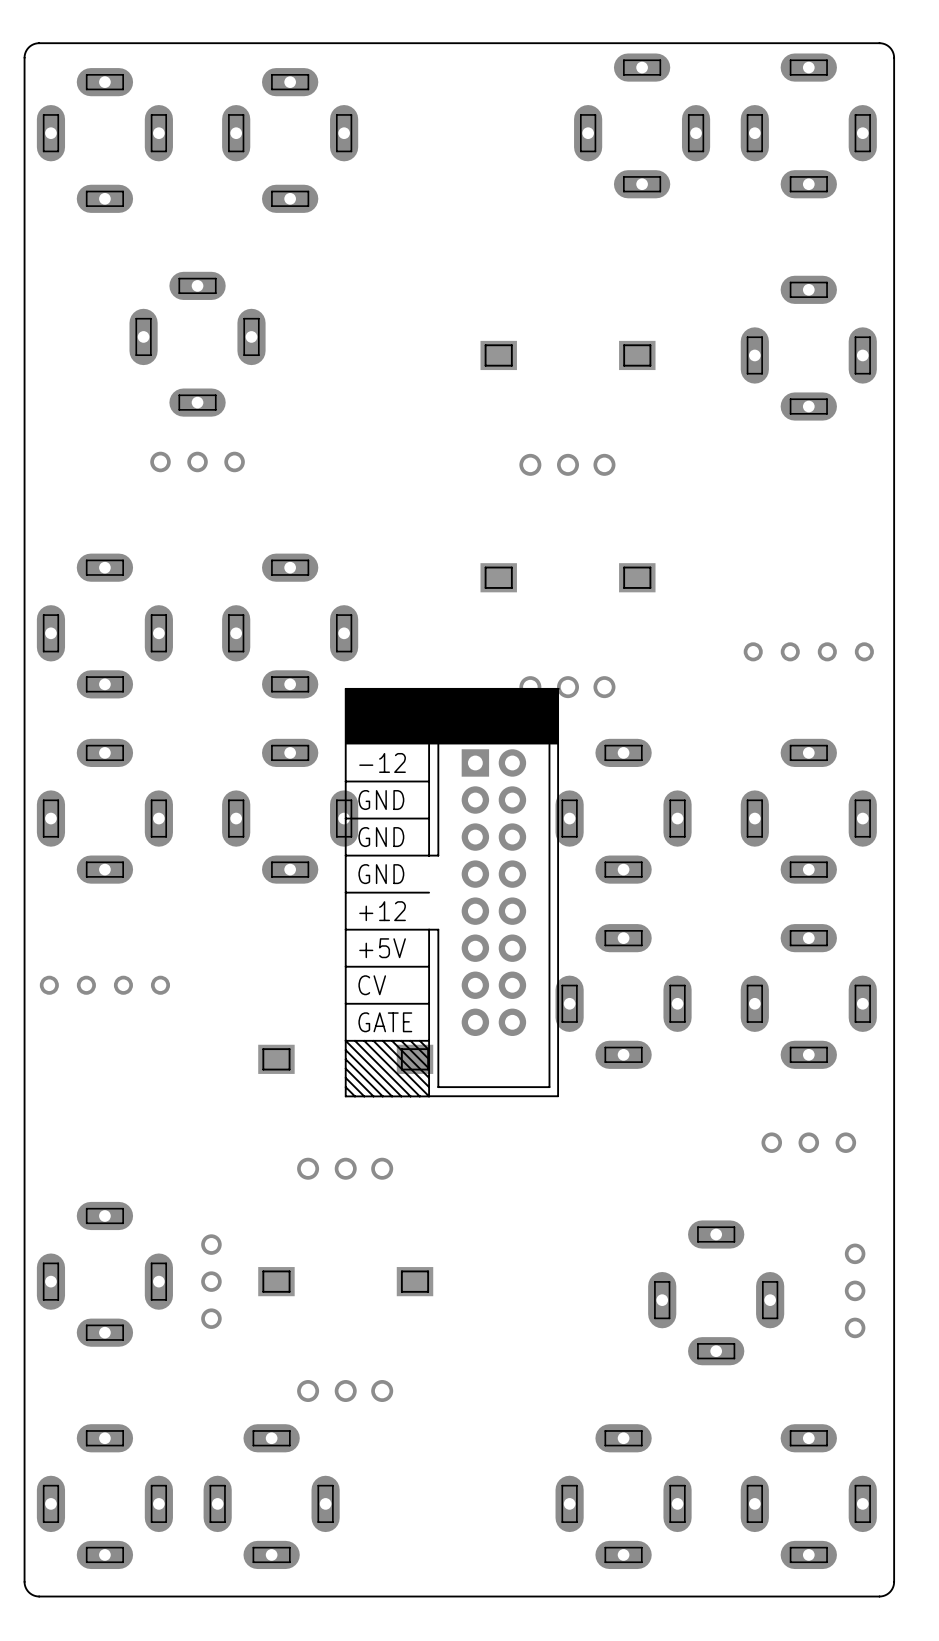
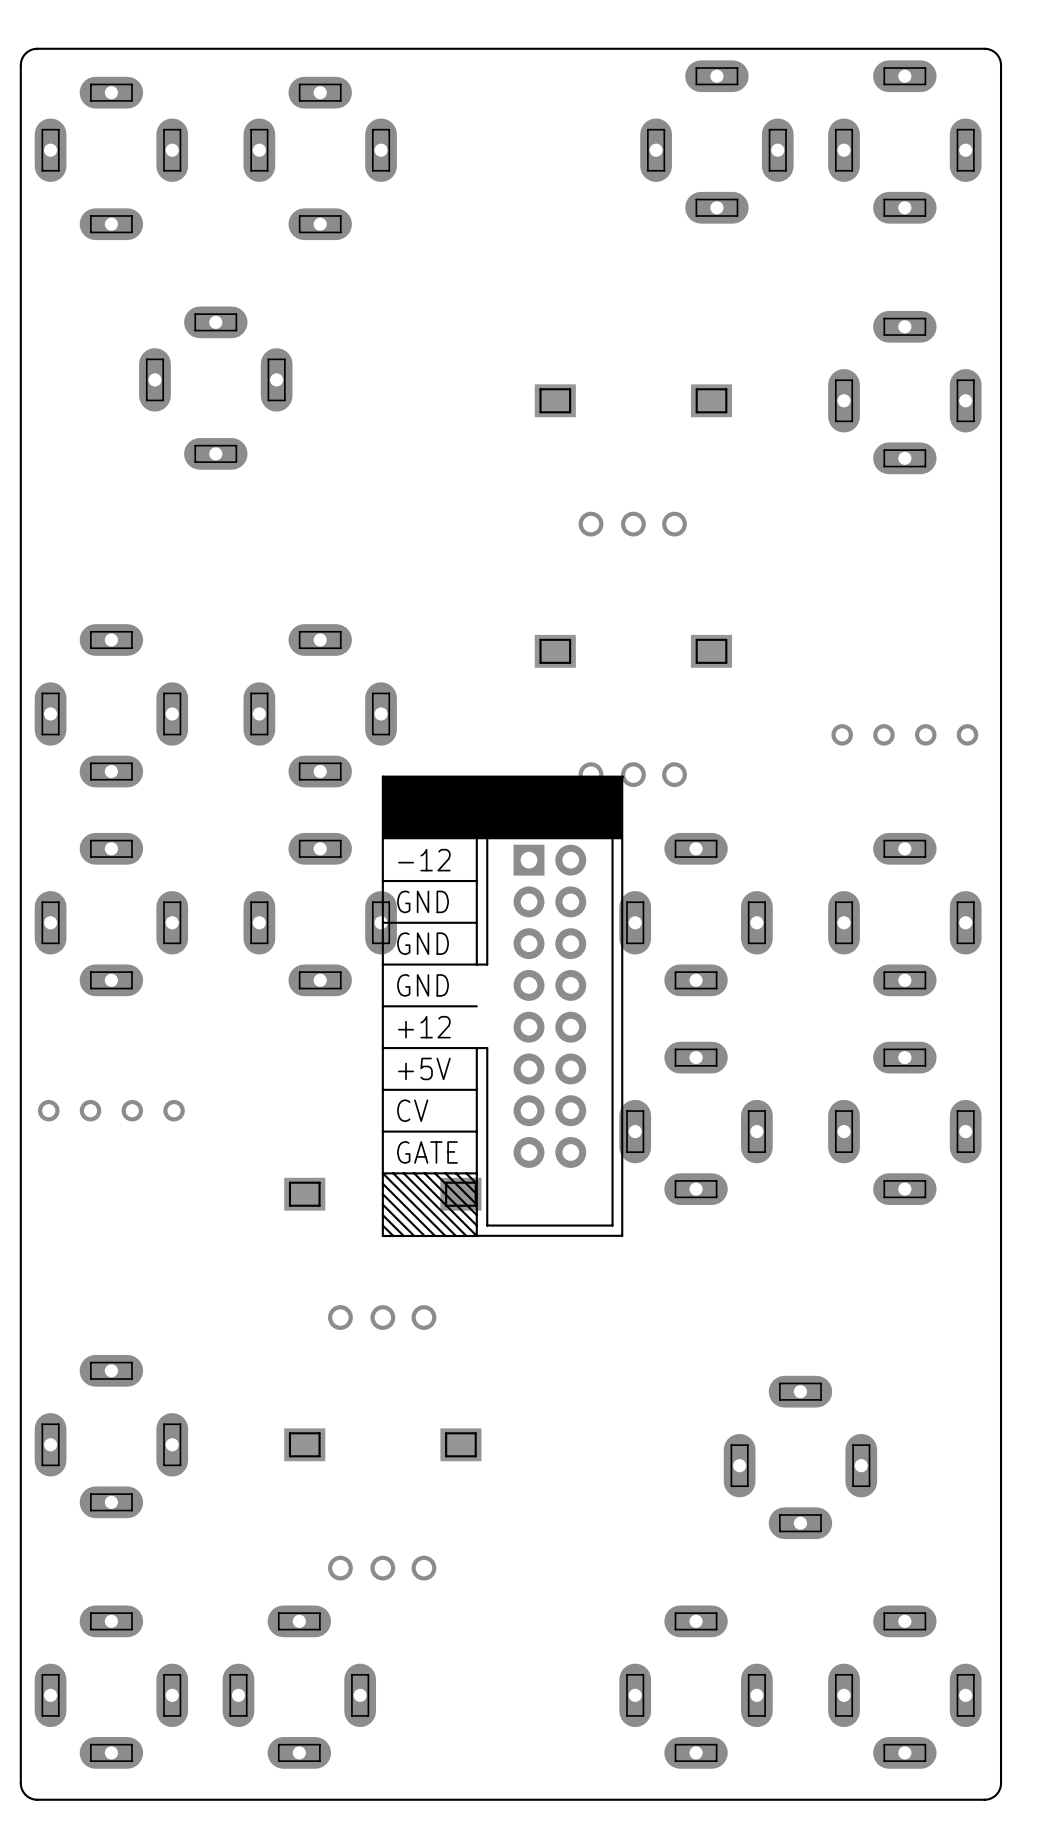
part: (197, 461) -> none
part: (808, 1142) -> none
part: (211, 1281) -> none
part: (855, 1290) -> none

